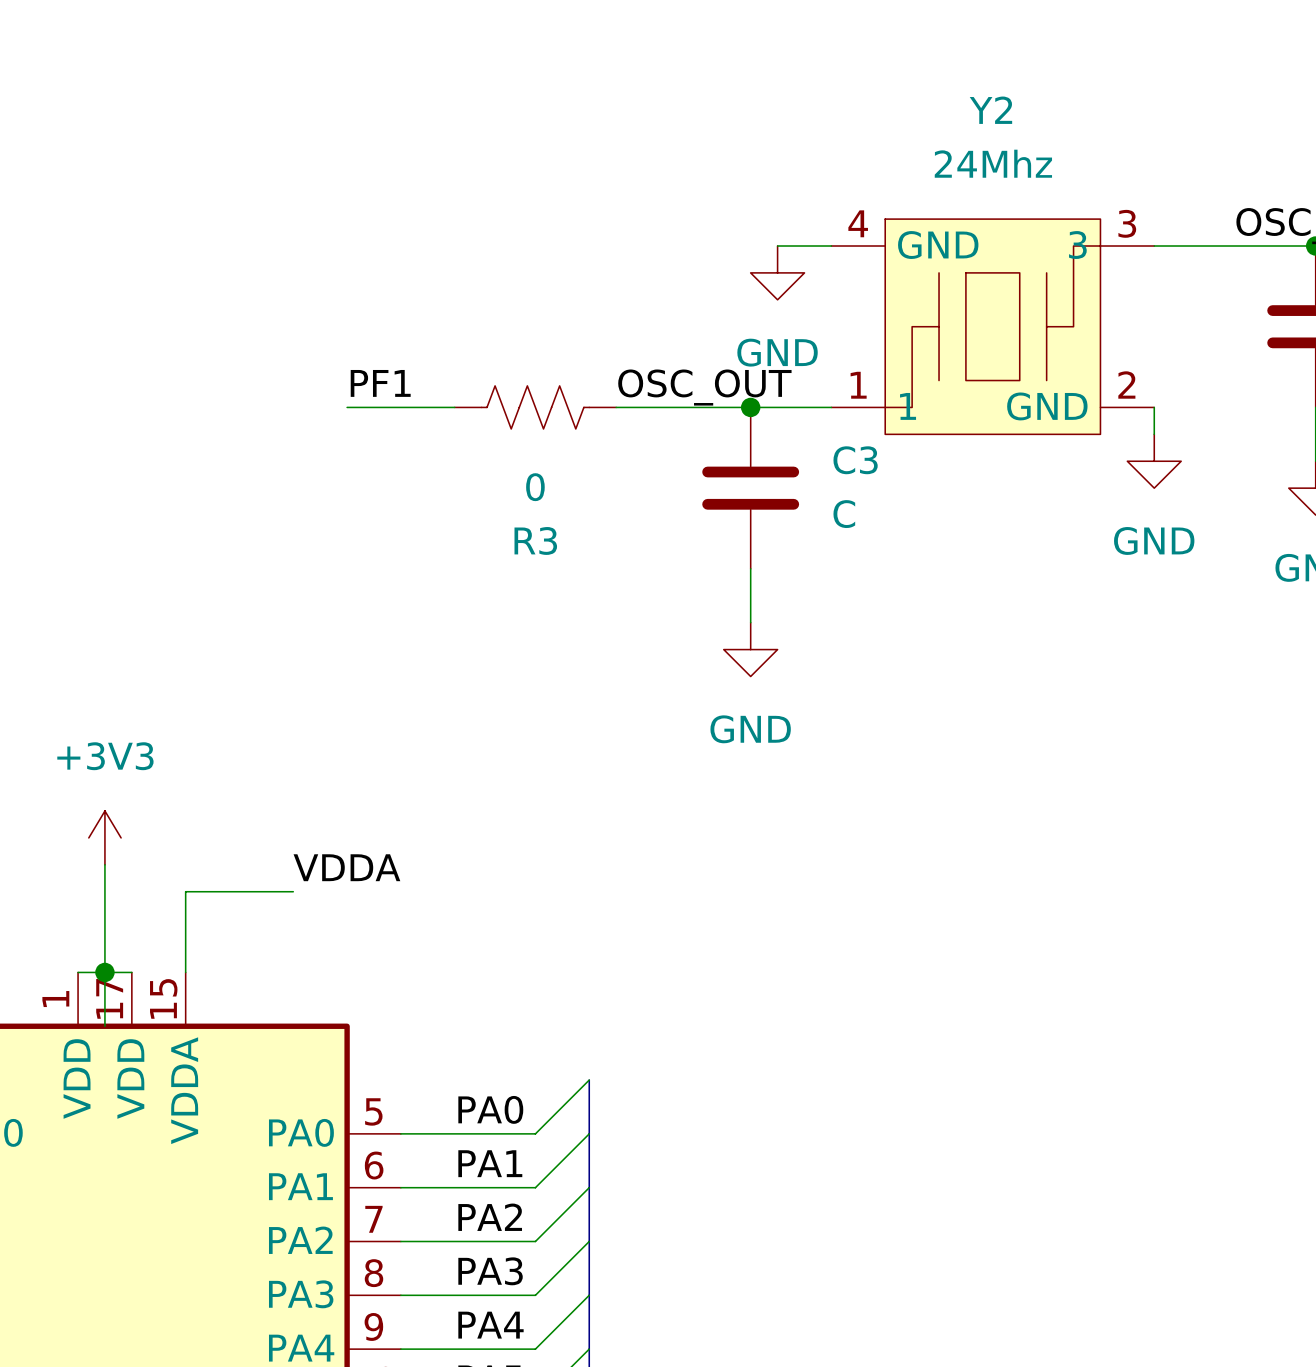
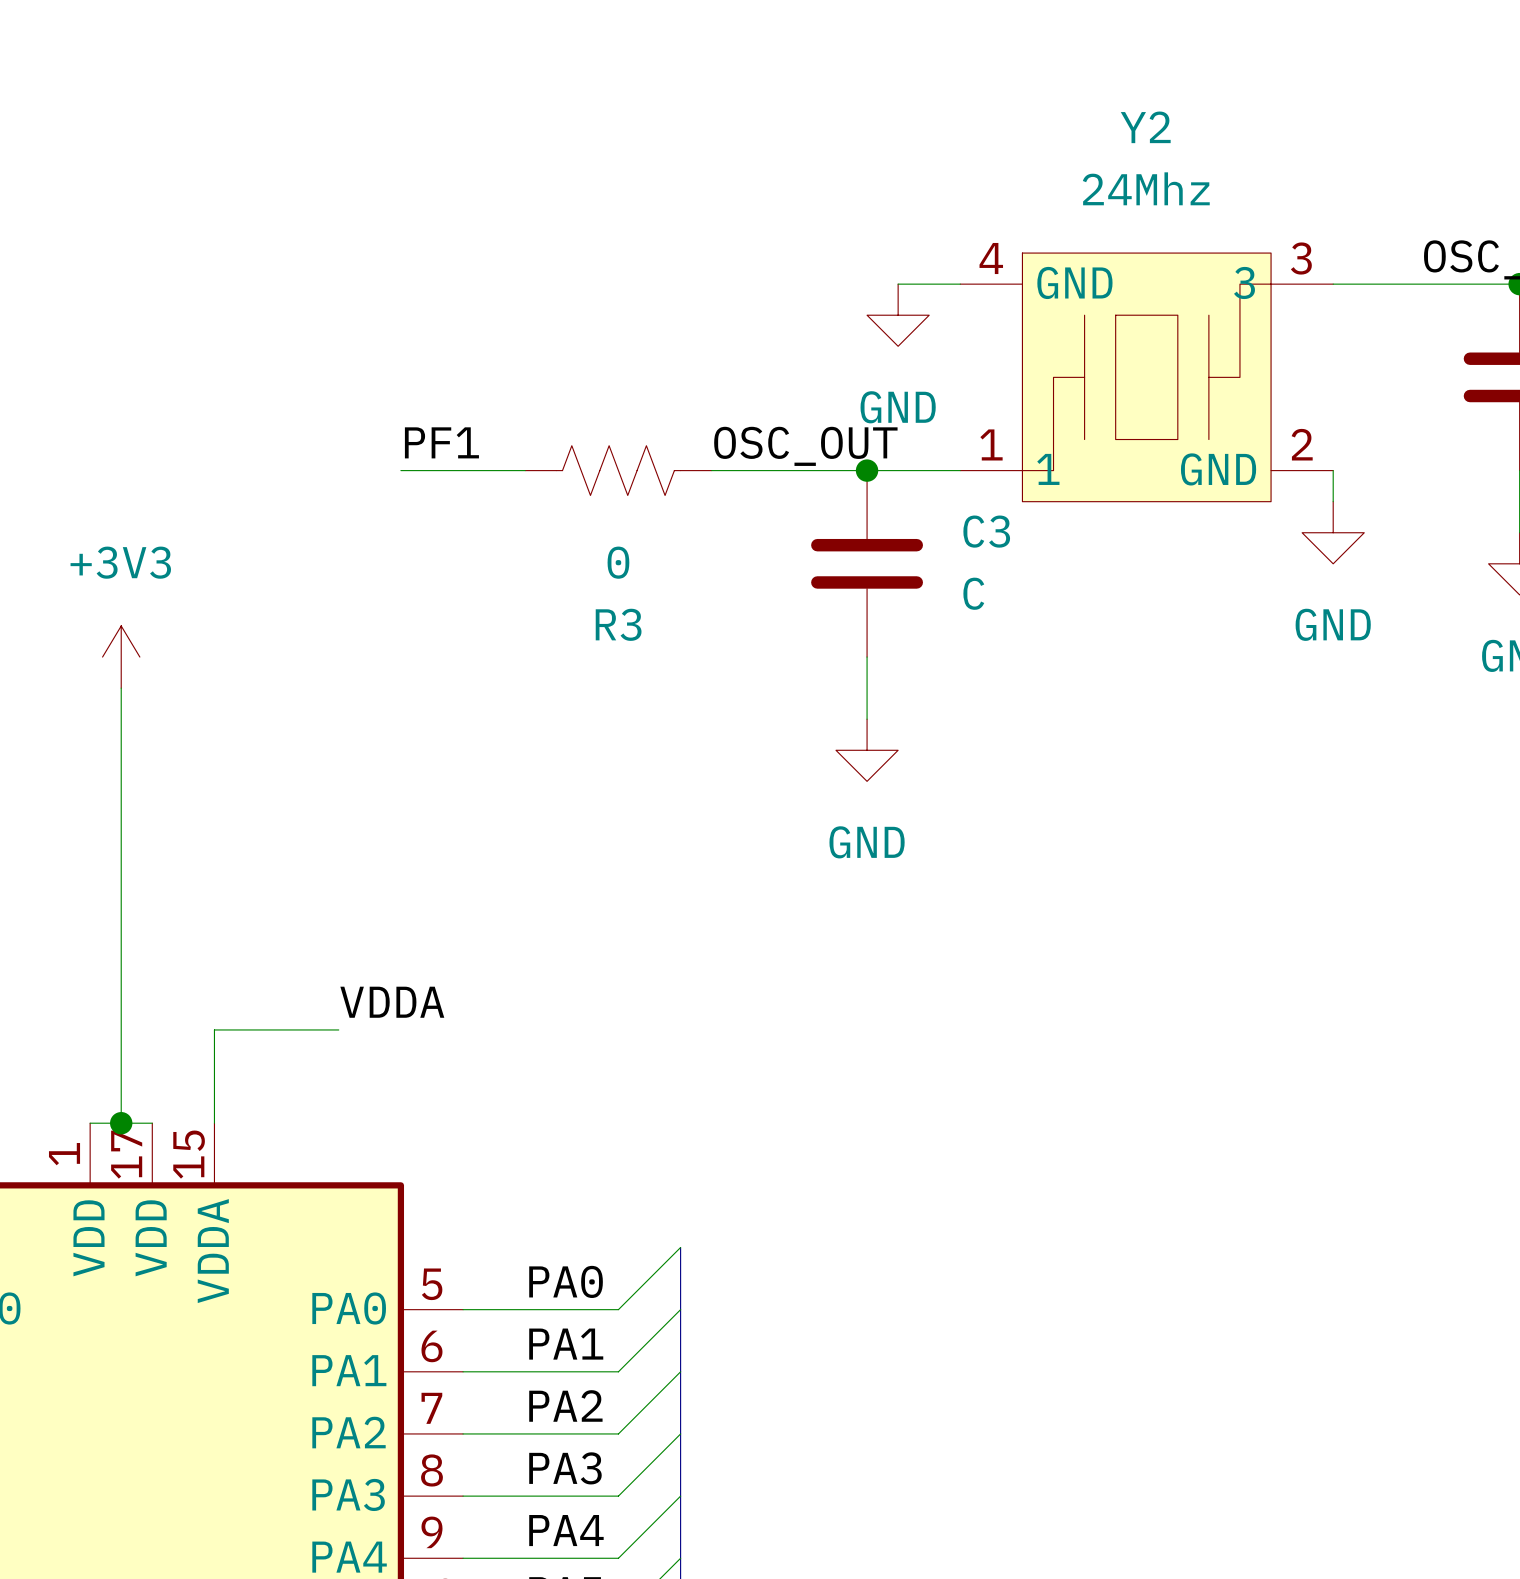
wire: none -> (121, 688) (121, 998)
power symbol position: +3V3 (104, 837) -> +3V3 (121, 657)
wire: (104, 972) (104, 1026) -> none

